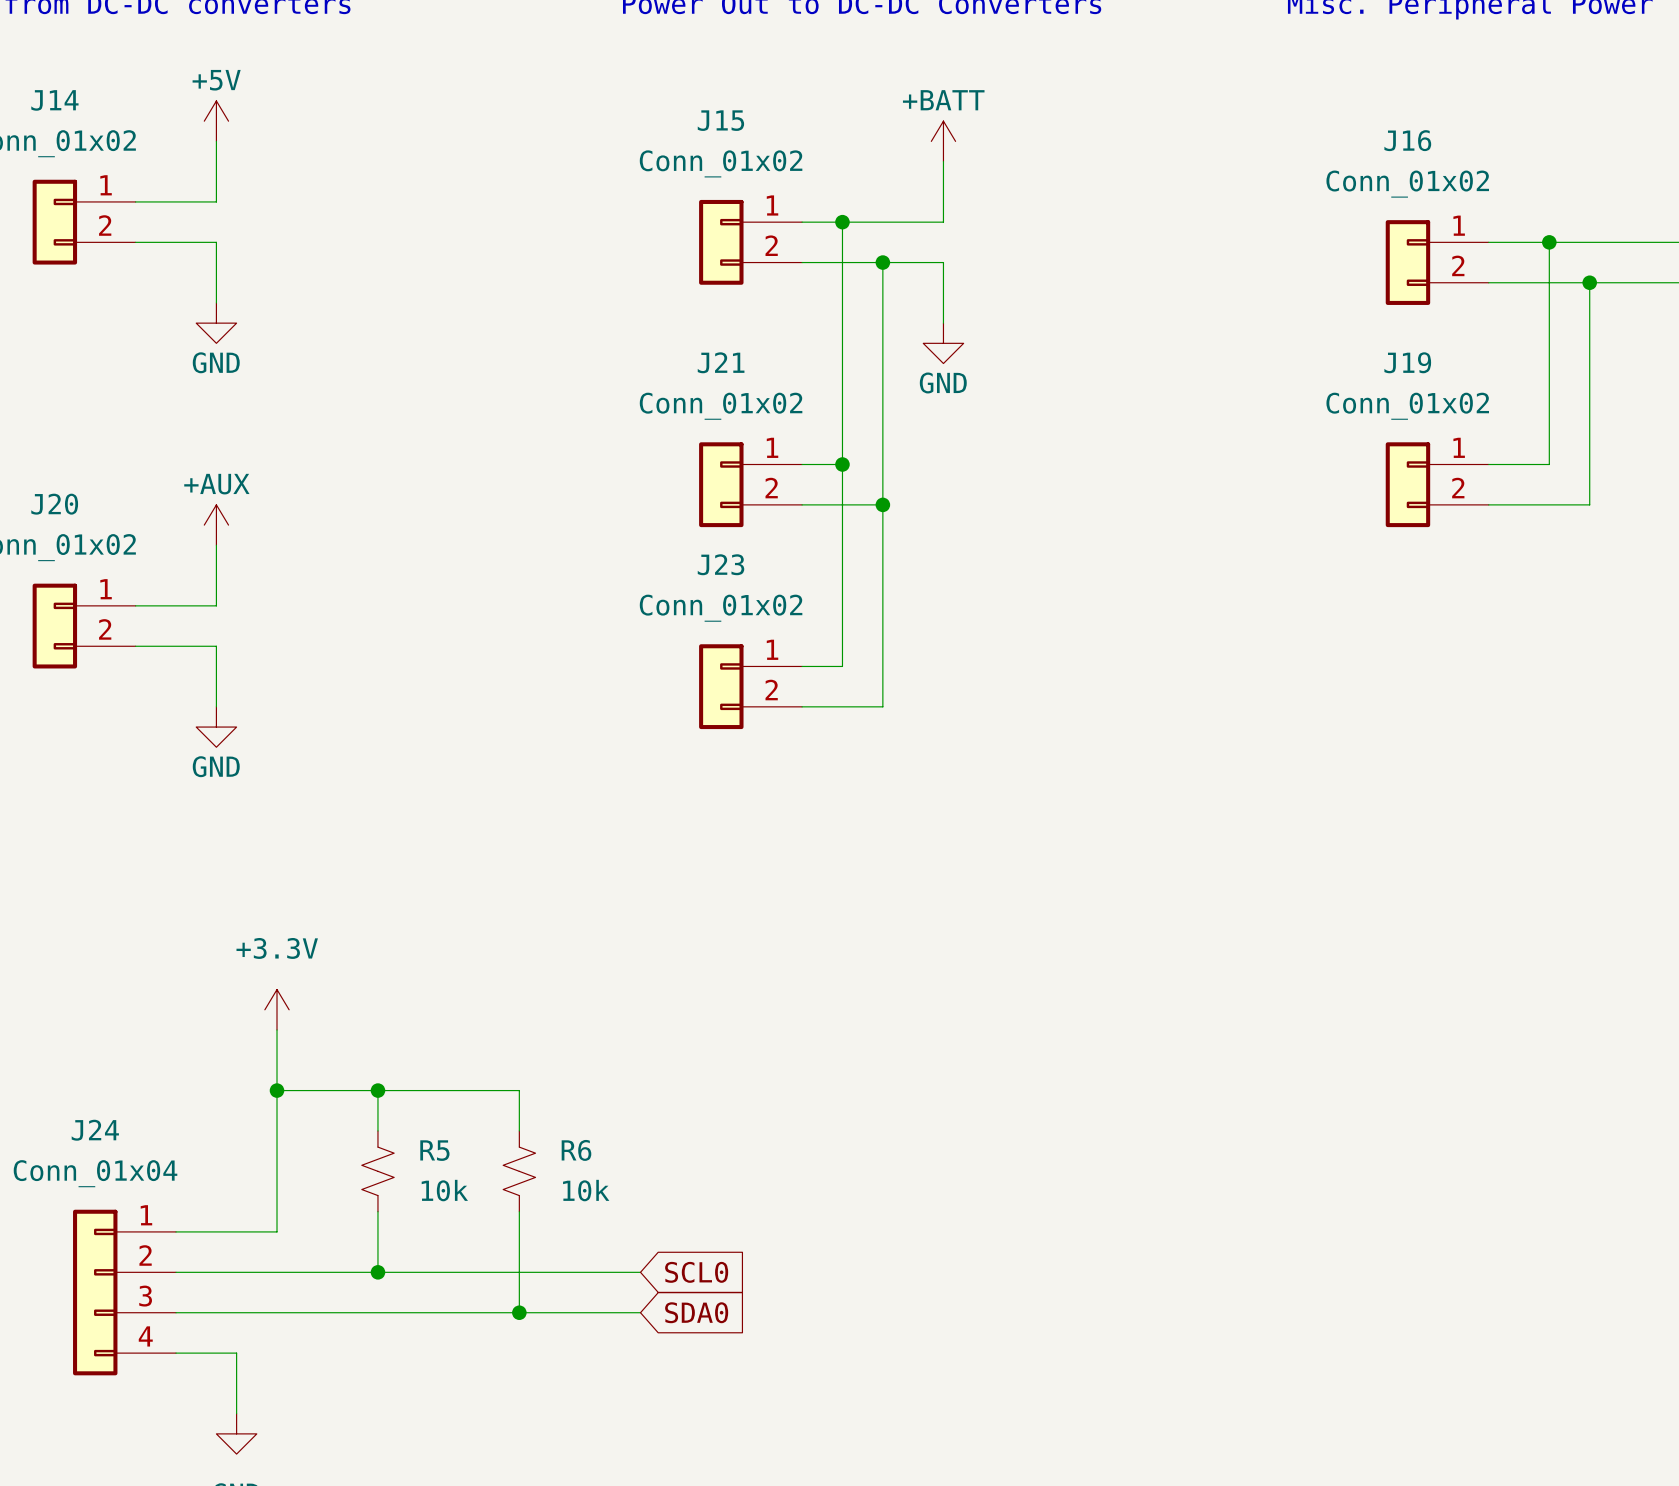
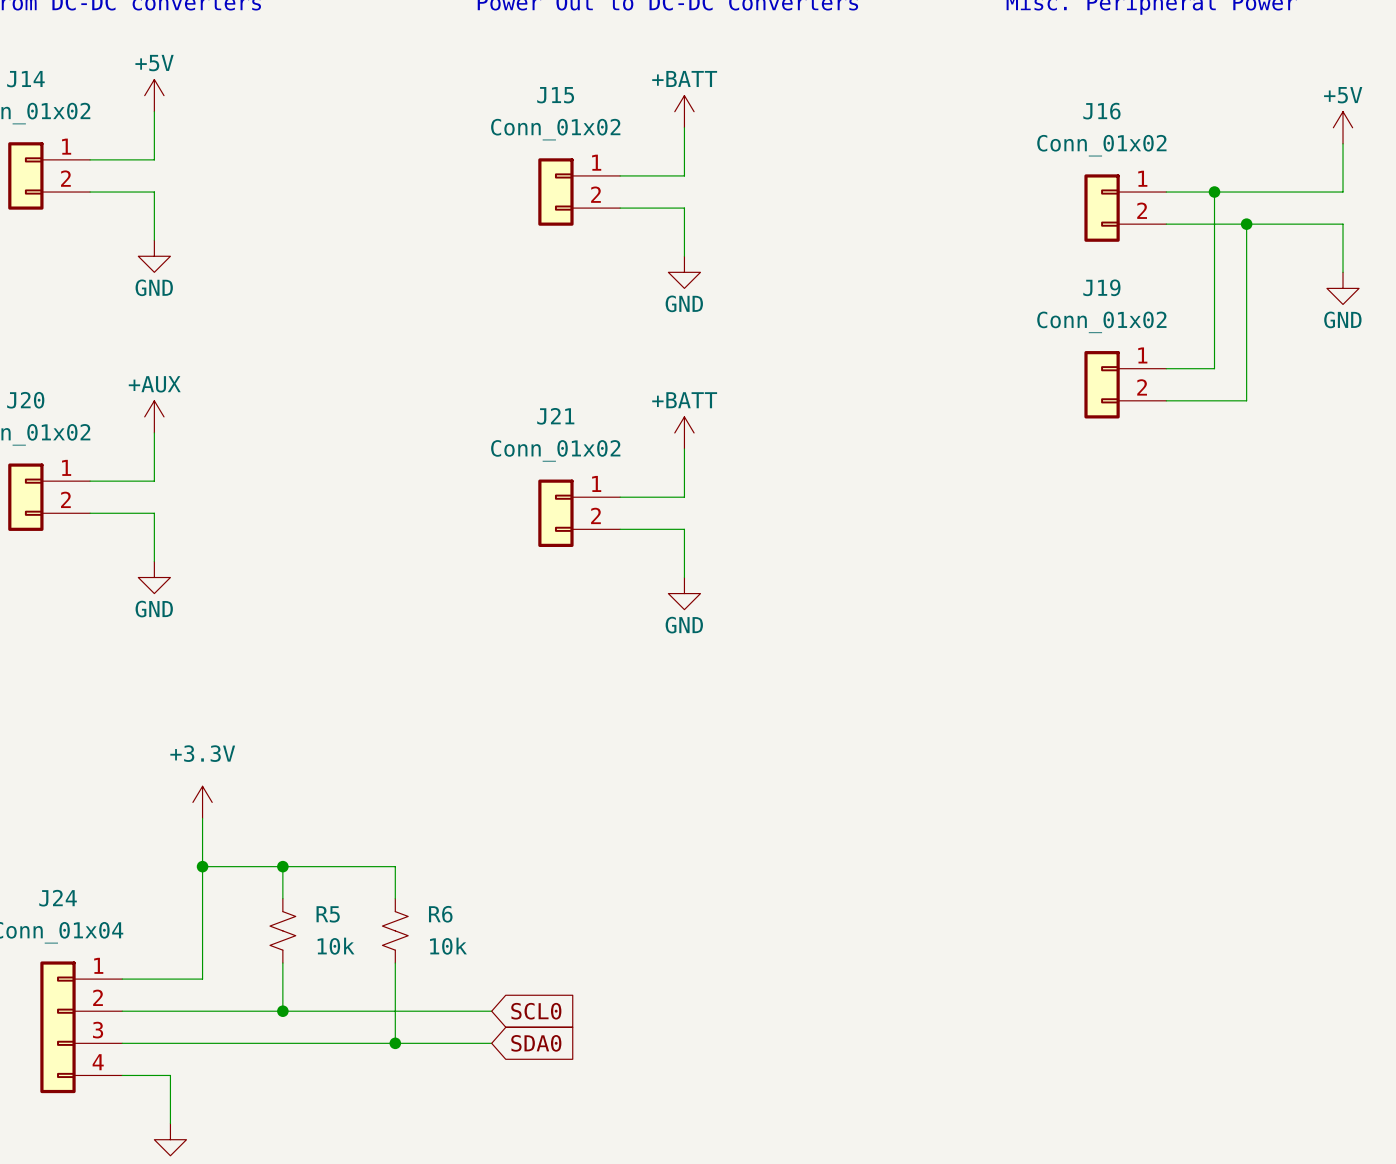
power symbol position: +BATT (943, 141) -> +BATT (684, 111)
wire: (943, 161) (943, 222) (882, 222) -> (684, 127) (684, 175)
wire: (842, 222) (842, 666) -> none
junction: (842, 222) -> none
wire: (882, 262) (943, 262) (943, 323) -> none
junction: (882, 262) -> none
wire: (882, 323) (882, 565) -> none
power symbol position: GND (943, 343) -> GND (684, 272)
wire: (802, 464) (842, 464) -> none
junction: (842, 464) -> none
J21 position: (750, 484) -> (579, 513)
wire: (802, 504) (882, 504) -> (620, 497) (684, 497)
junction: (882, 504) -> none
power symbol: none -> +BATT (684, 432)
wire: (882, 626) (882, 666) -> (652, 529) (684, 529)
J23: Conn_01x02 (750, 686) -> none
wire: (802, 706) (882, 706) -> (684, 577) (684, 561)
power symbol: none -> GND (684, 593)

